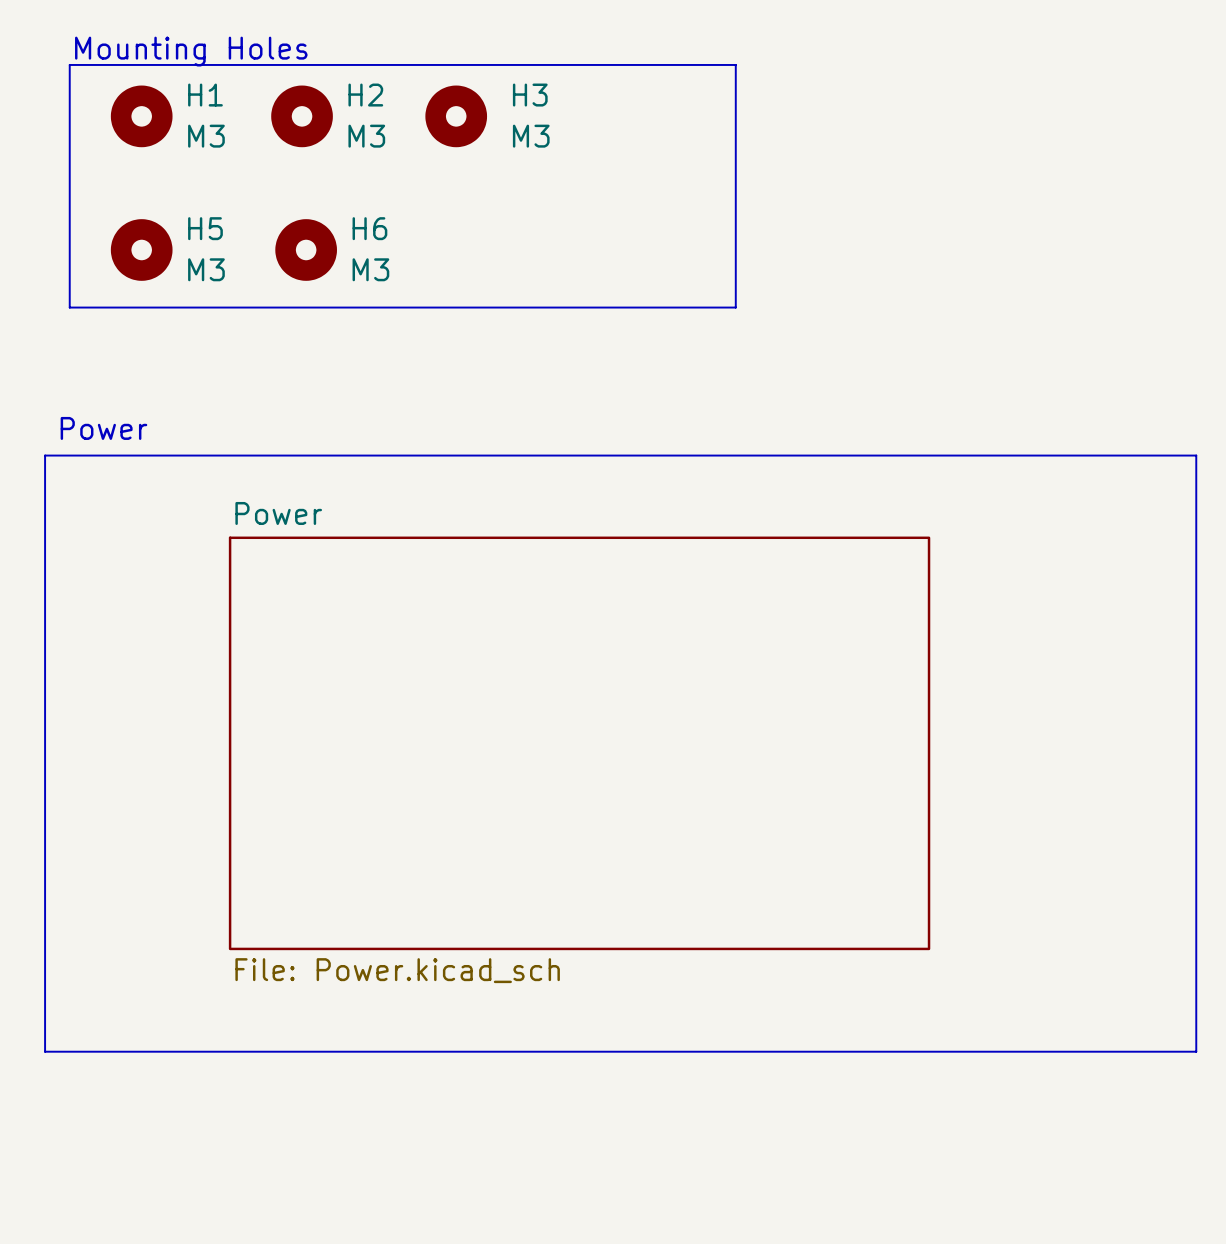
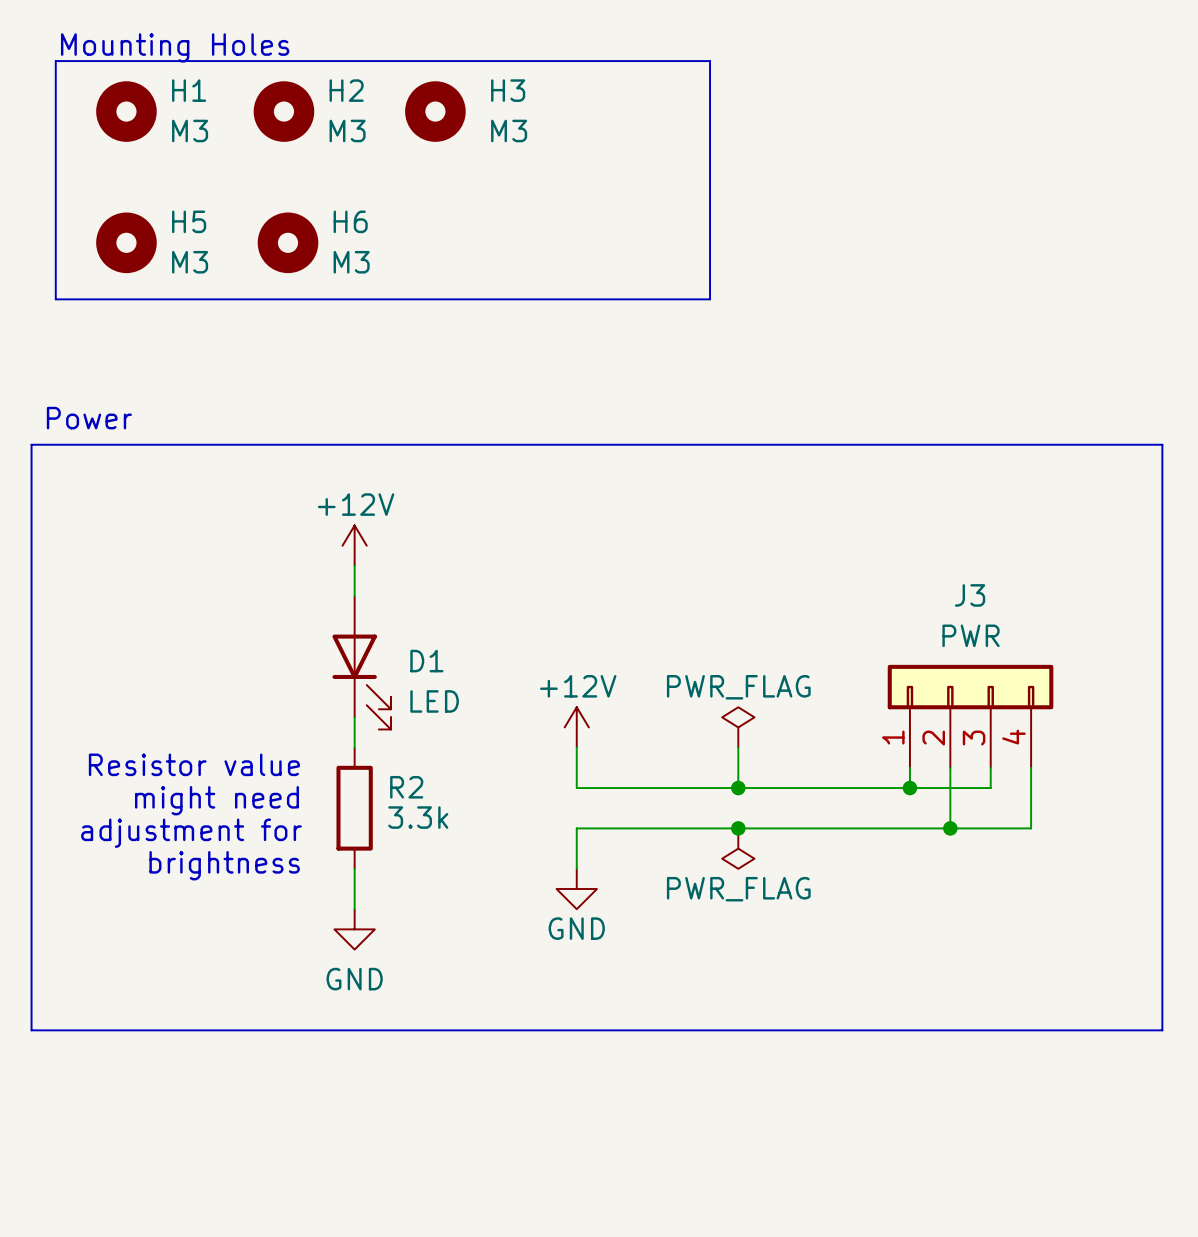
power symbol: none -> +12V (354, 545)
wire: none -> (354, 565) (354, 596)
D1: none -> LED (361, 662)
J3: none -> PWR (970, 716)
wire: none -> (354, 717) (354, 747)
sheet Power: File: Power.kicad_sch (579, 743) -> none
power symbol: none -> +12V (576, 727)
power symbol: none -> PWR_FLAG (738, 727)
wire: none -> (576, 747) (576, 788) (990, 788) (990, 767)
wire: none -> (738, 747) (738, 788)
text: none -> Resistor value (194, 764)
wire: none -> (909, 767) (909, 788)
wire: none -> (950, 767) (950, 828)
wire: none -> (1031, 767) (1031, 828) (576, 828) (576, 868)
junction: none -> (738, 788)
junction: none -> (909, 788)
text: none -> might need (216, 800)
R2: none -> 3.3k (354, 808)
junction: none -> (738, 828)
junction: none -> (950, 828)
text: none -> adjustment for (191, 833)
power symbol: none -> PWR_FLAG (738, 848)
text: none -> brightness (224, 865)
wire: none -> (354, 868) (354, 909)
power symbol: none -> GND (576, 888)
power symbol: none -> GND (354, 929)

